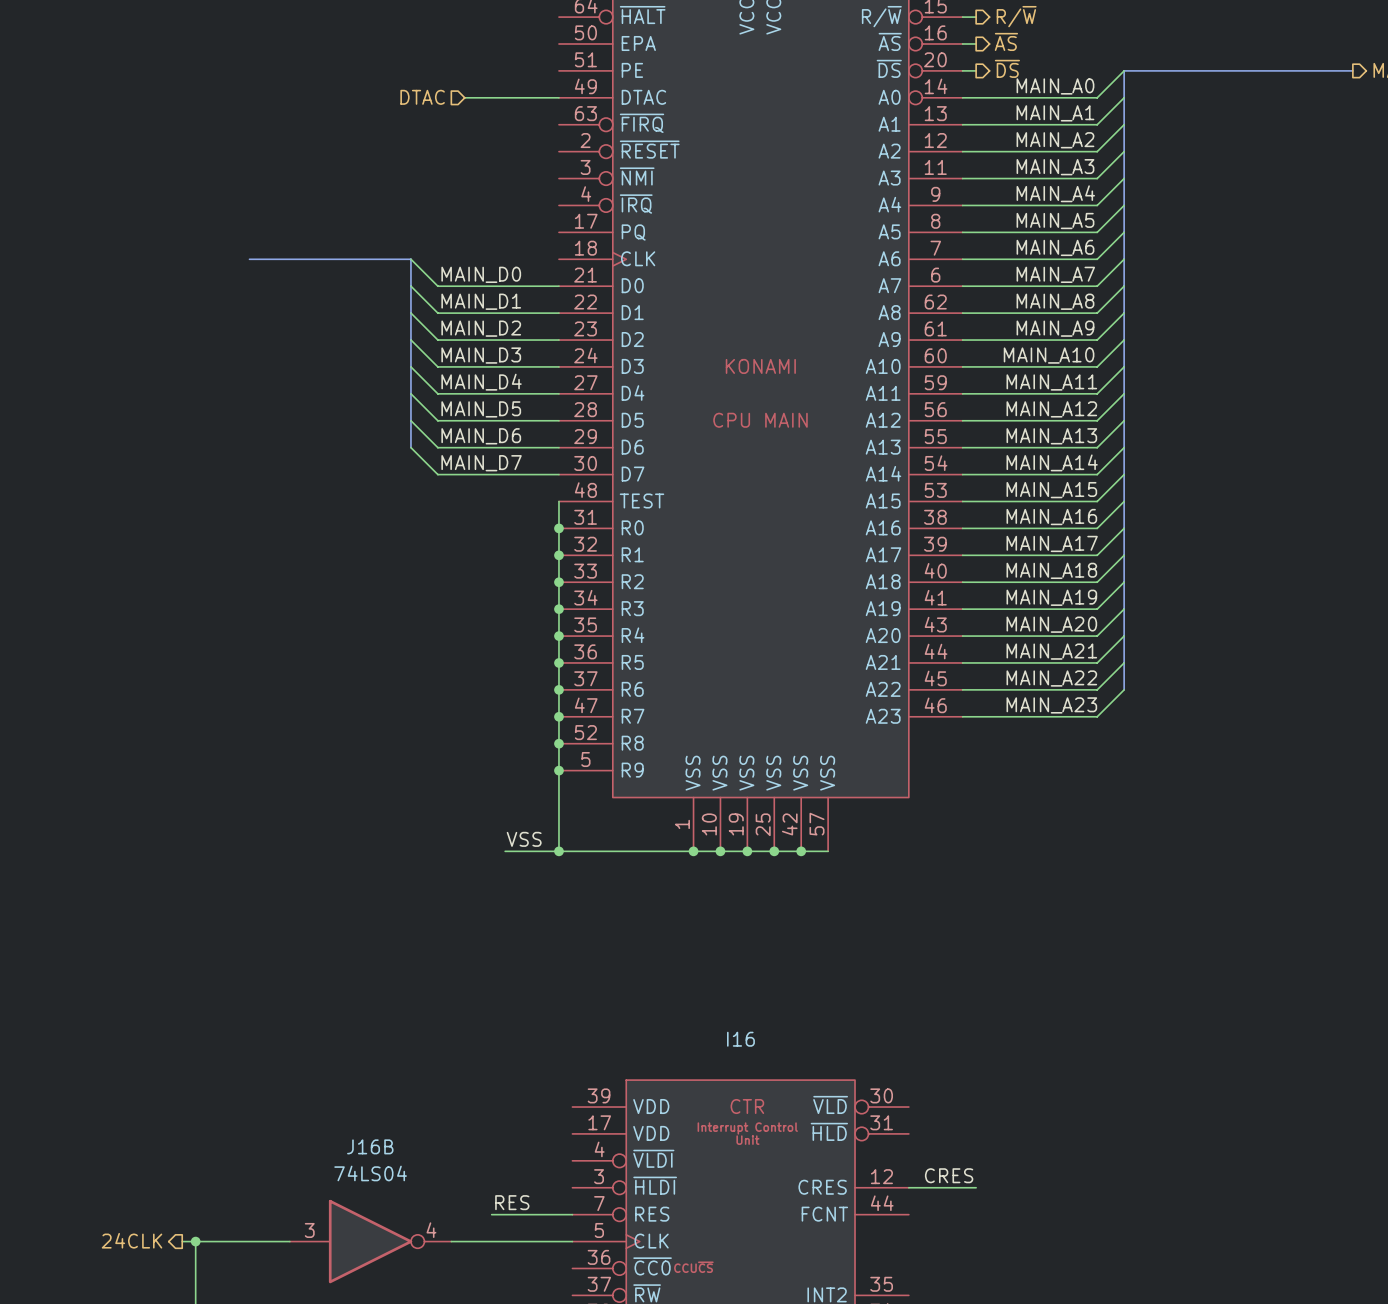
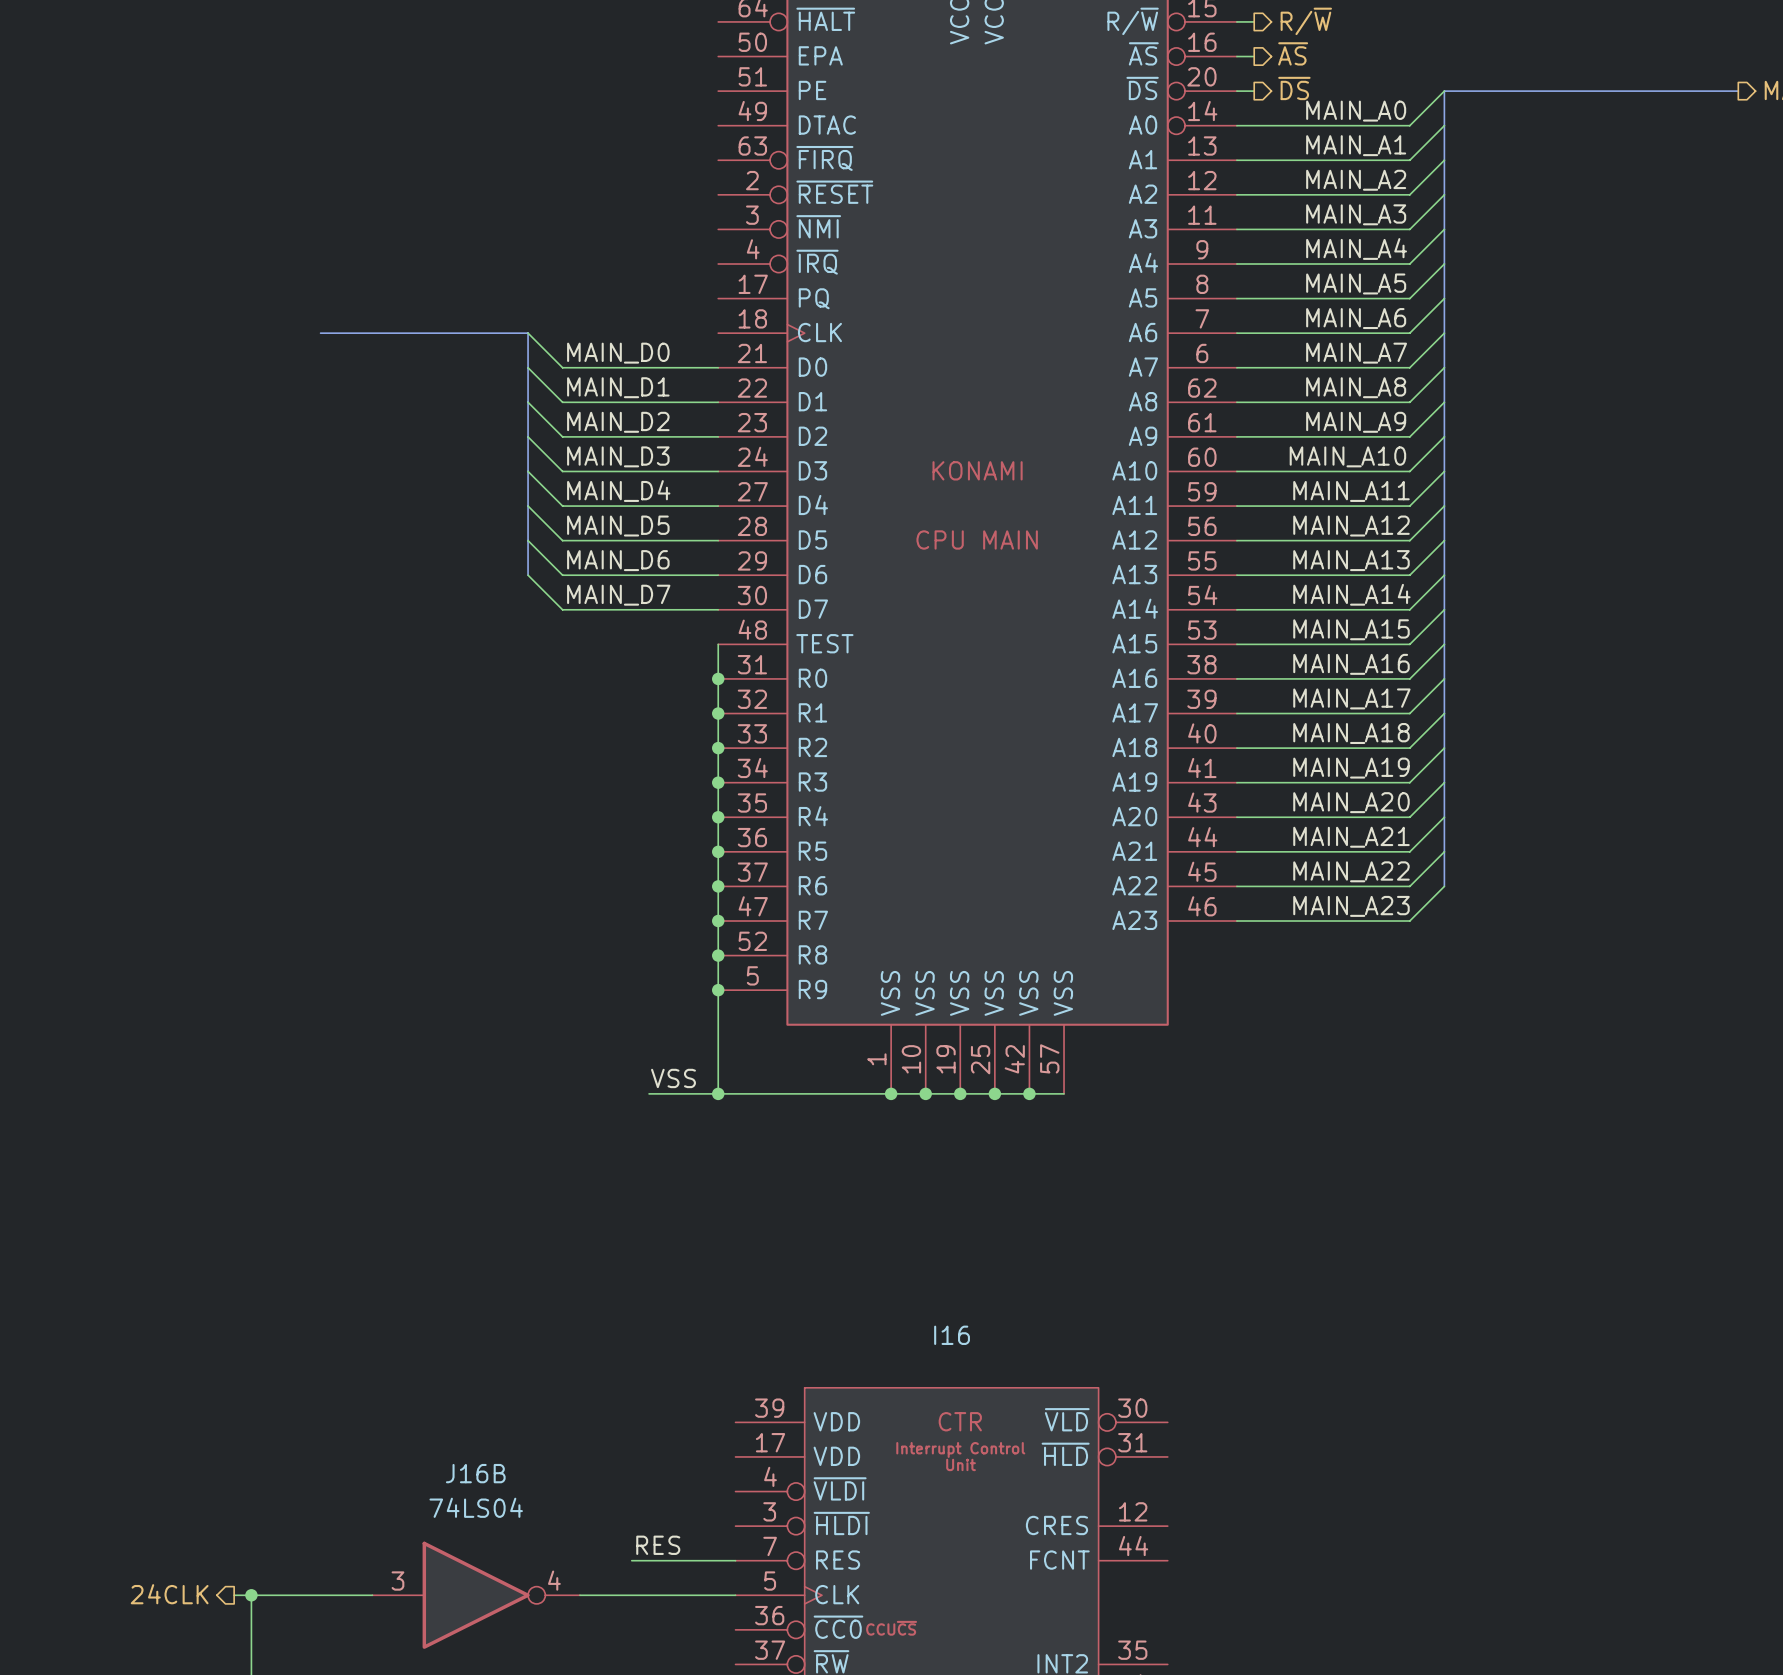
hierarchical label: DTAC (422, 97) -> none
wire: (464, 97) (558, 97) -> none
label: CRES (949, 1175) -> none
wire: (908, 1187) (976, 1187) -> none

